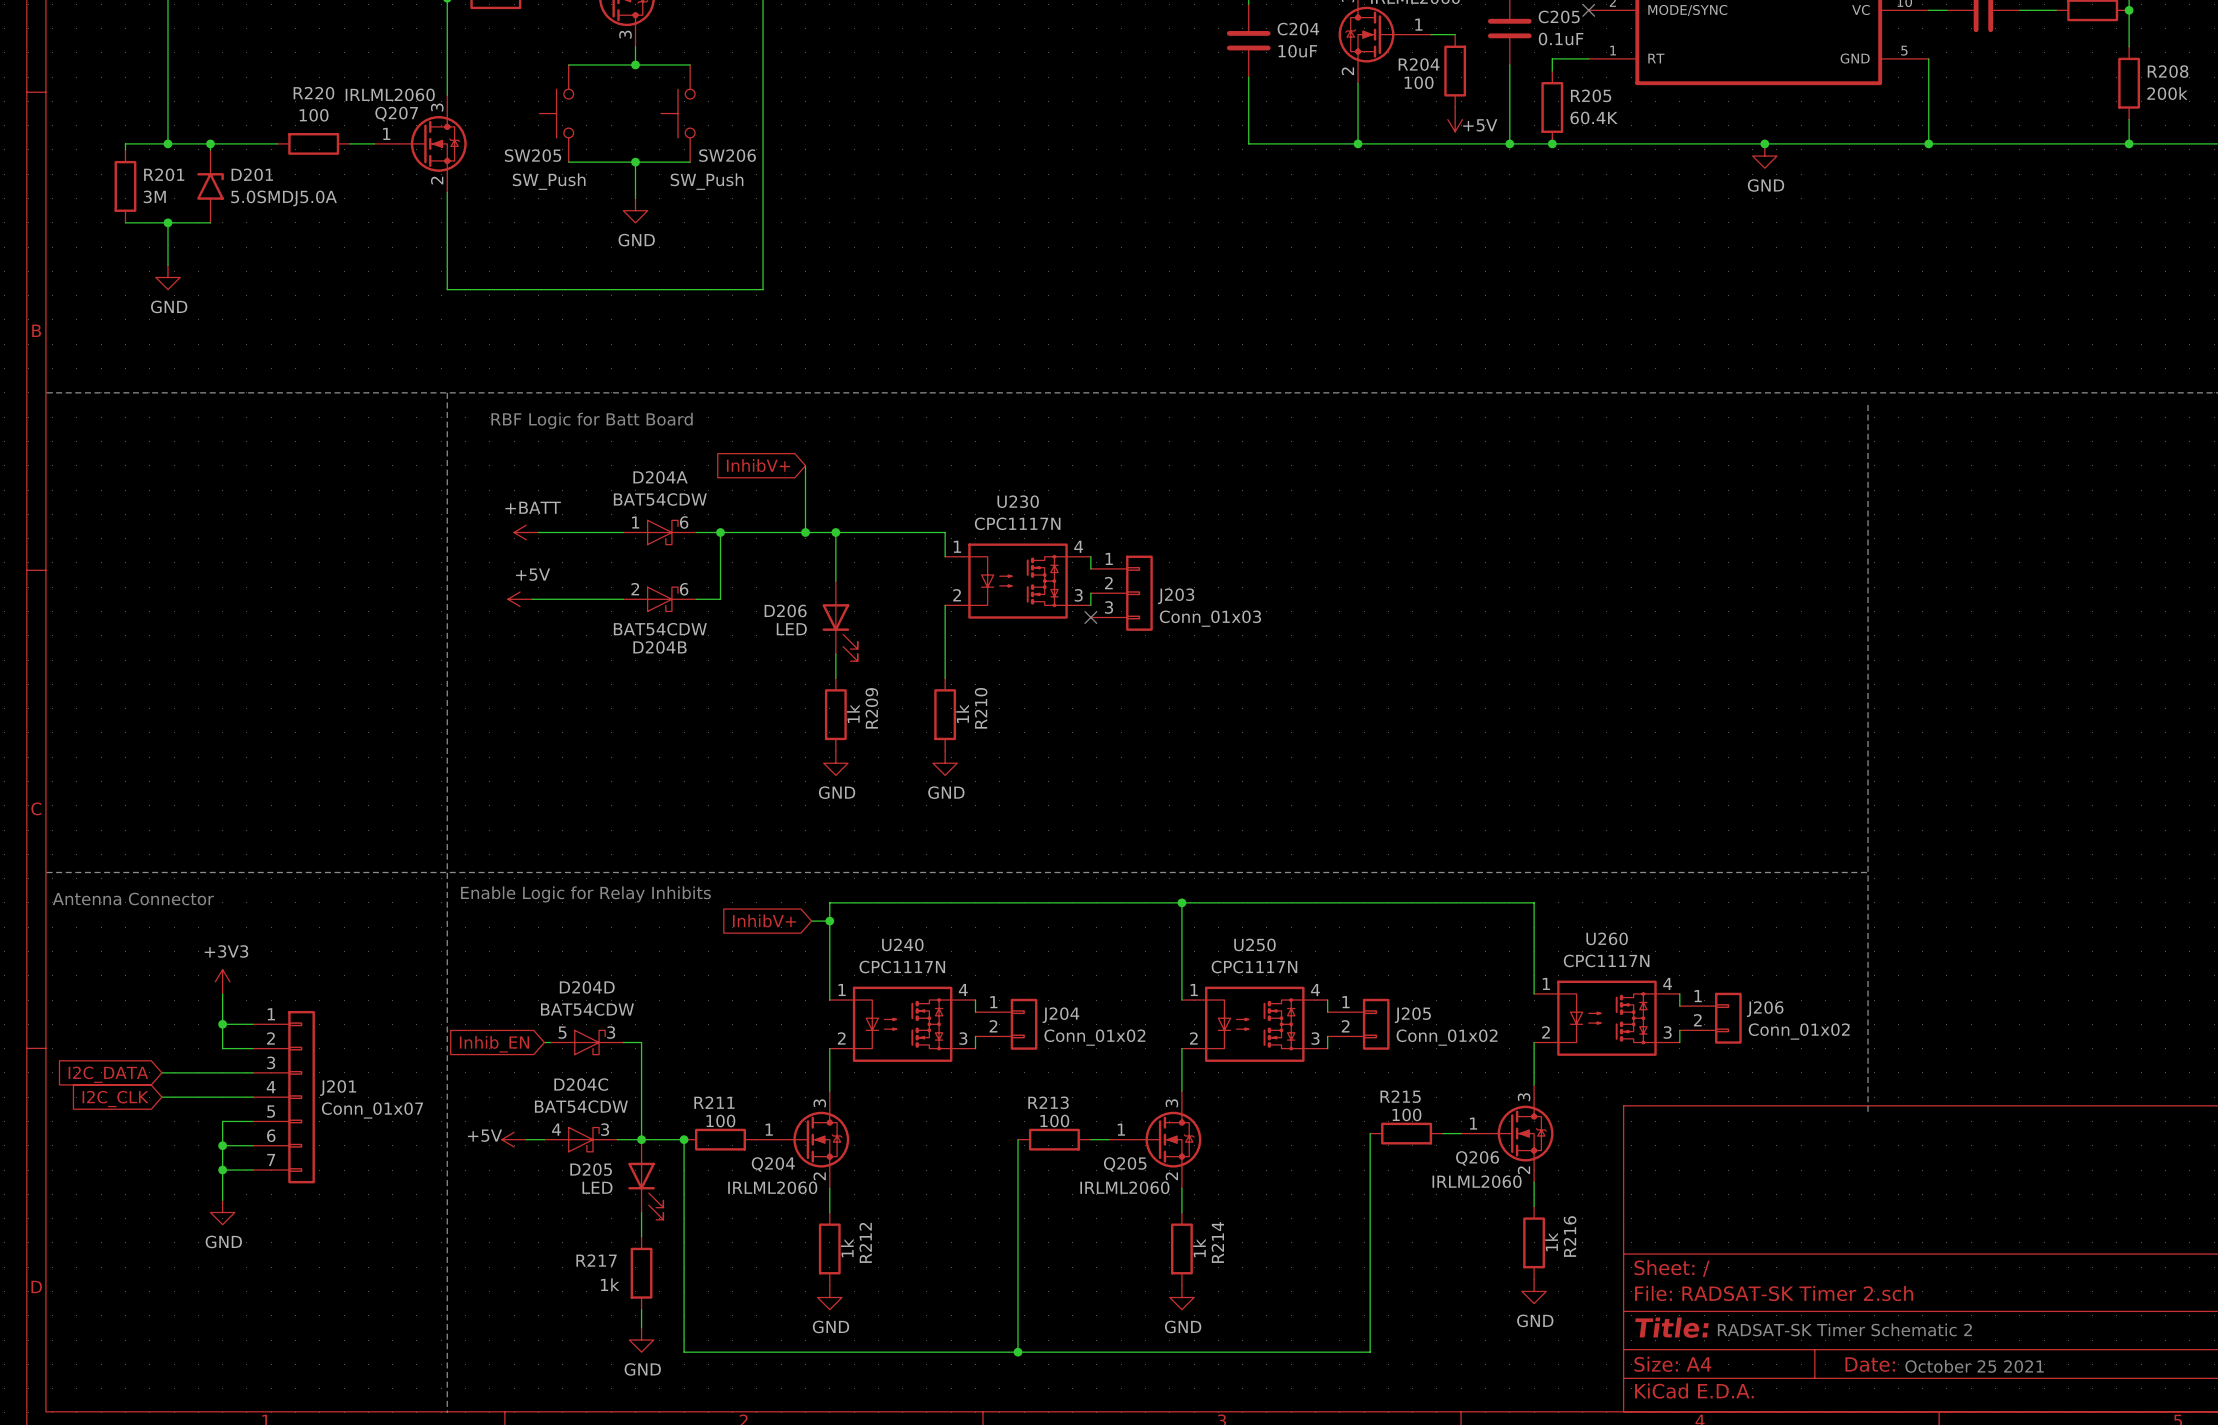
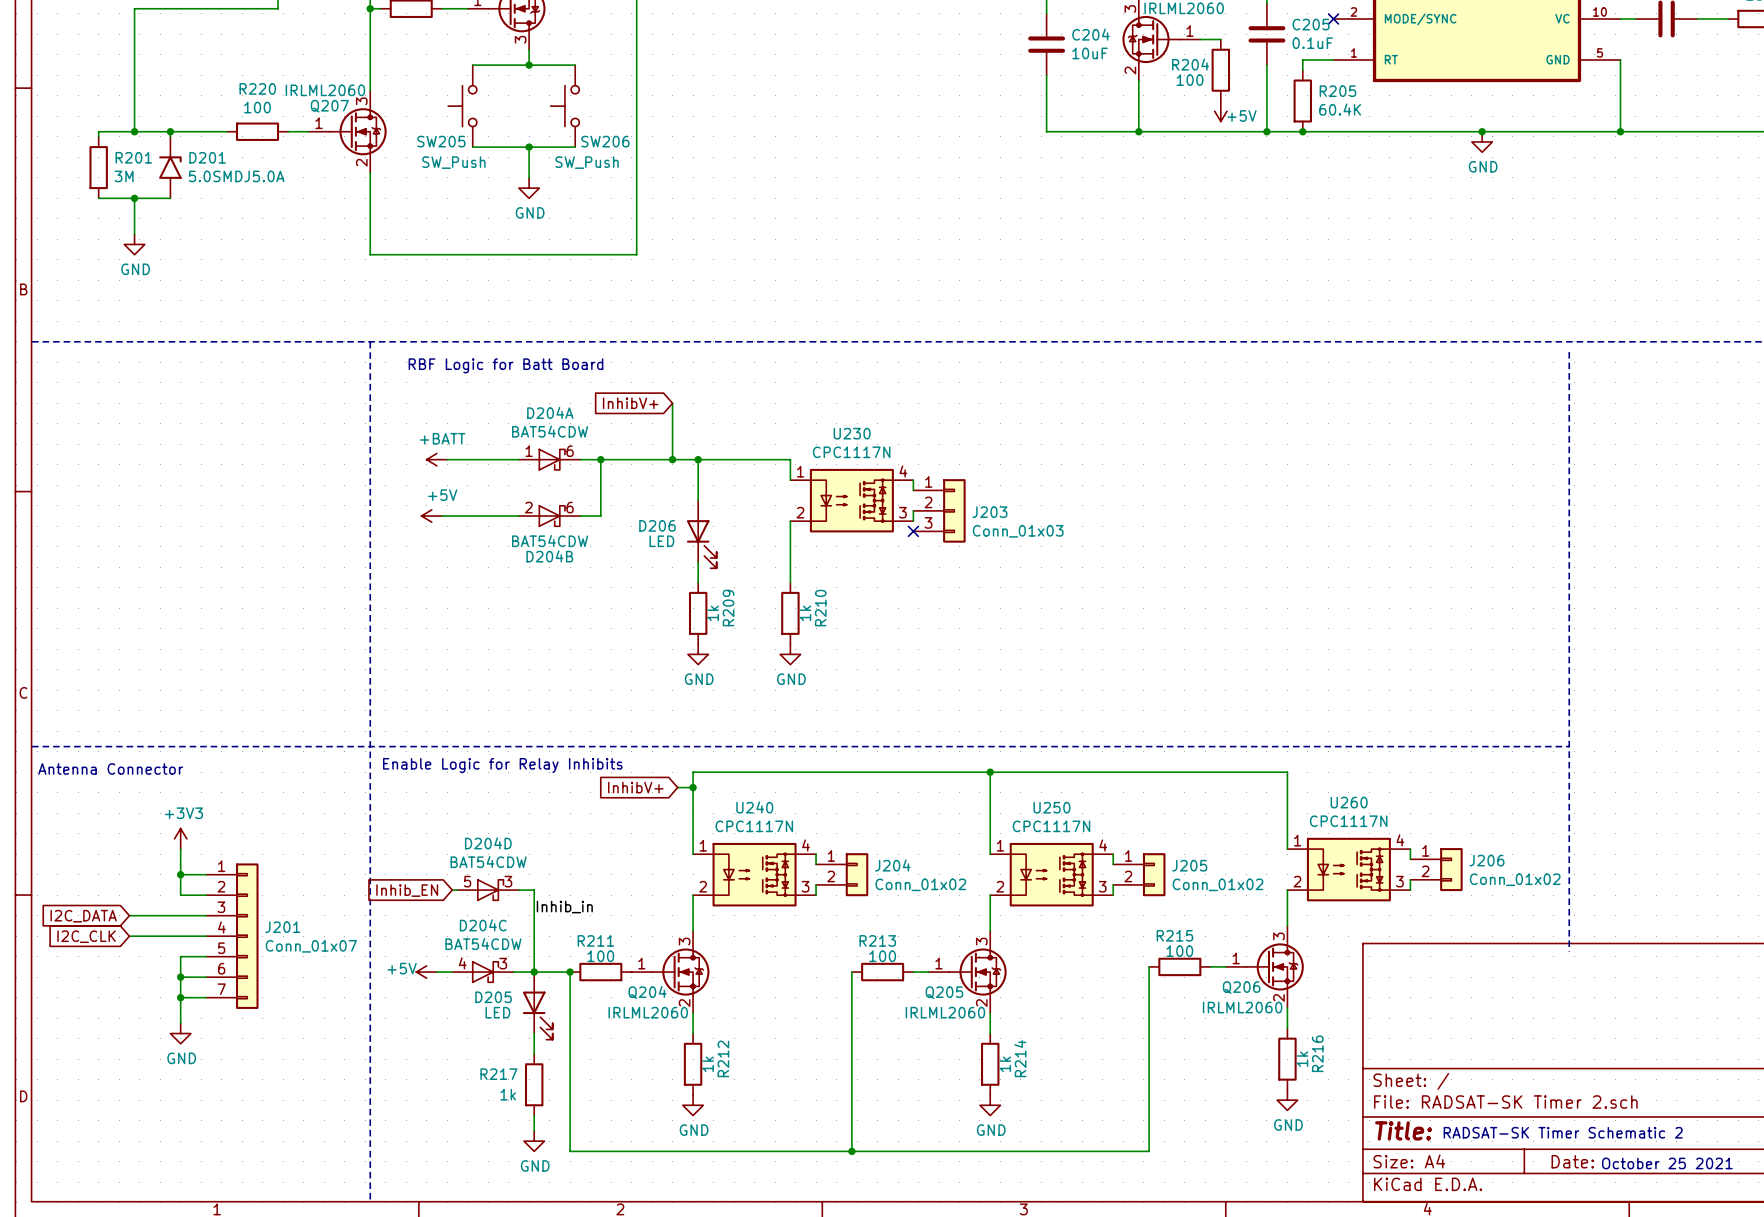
label: none -> Inhib_in (564, 907)

